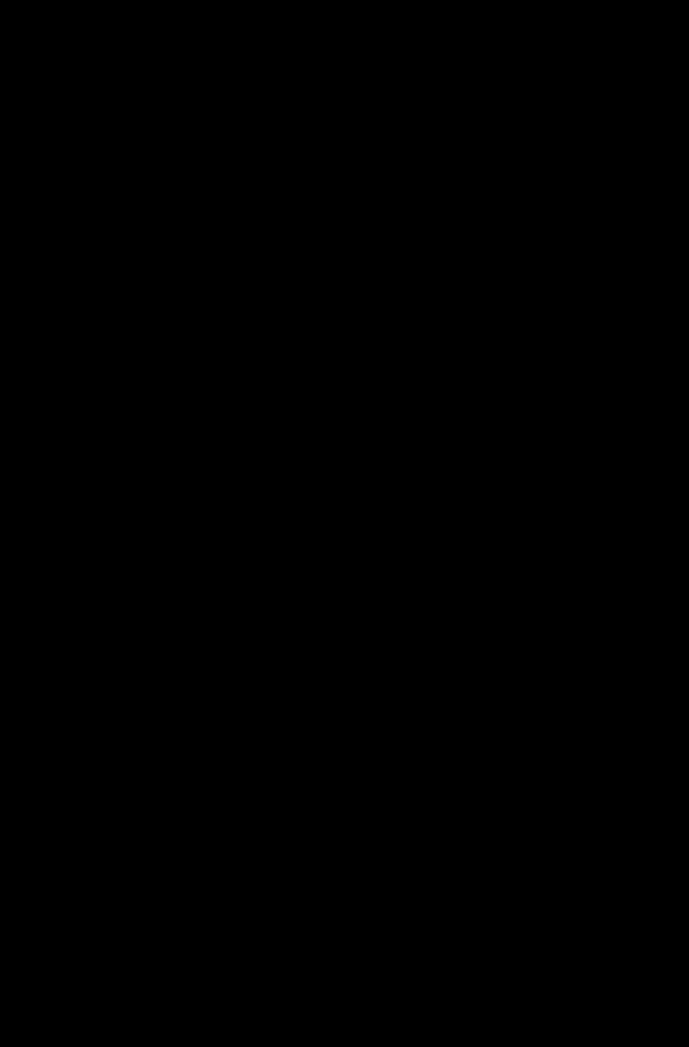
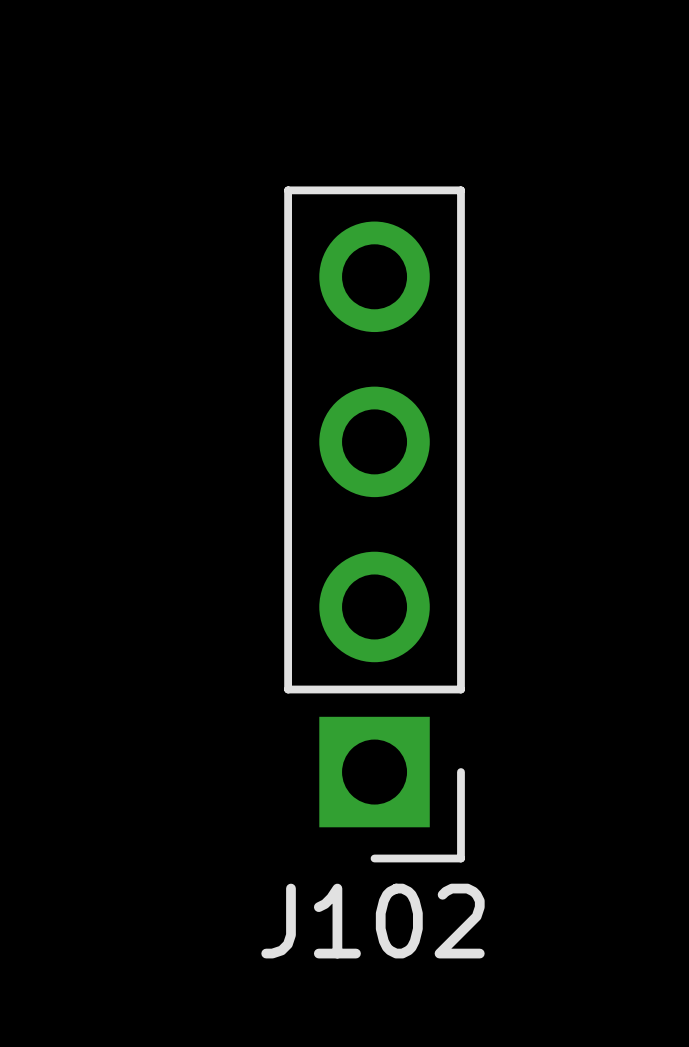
J102: none -> (374, 524)

